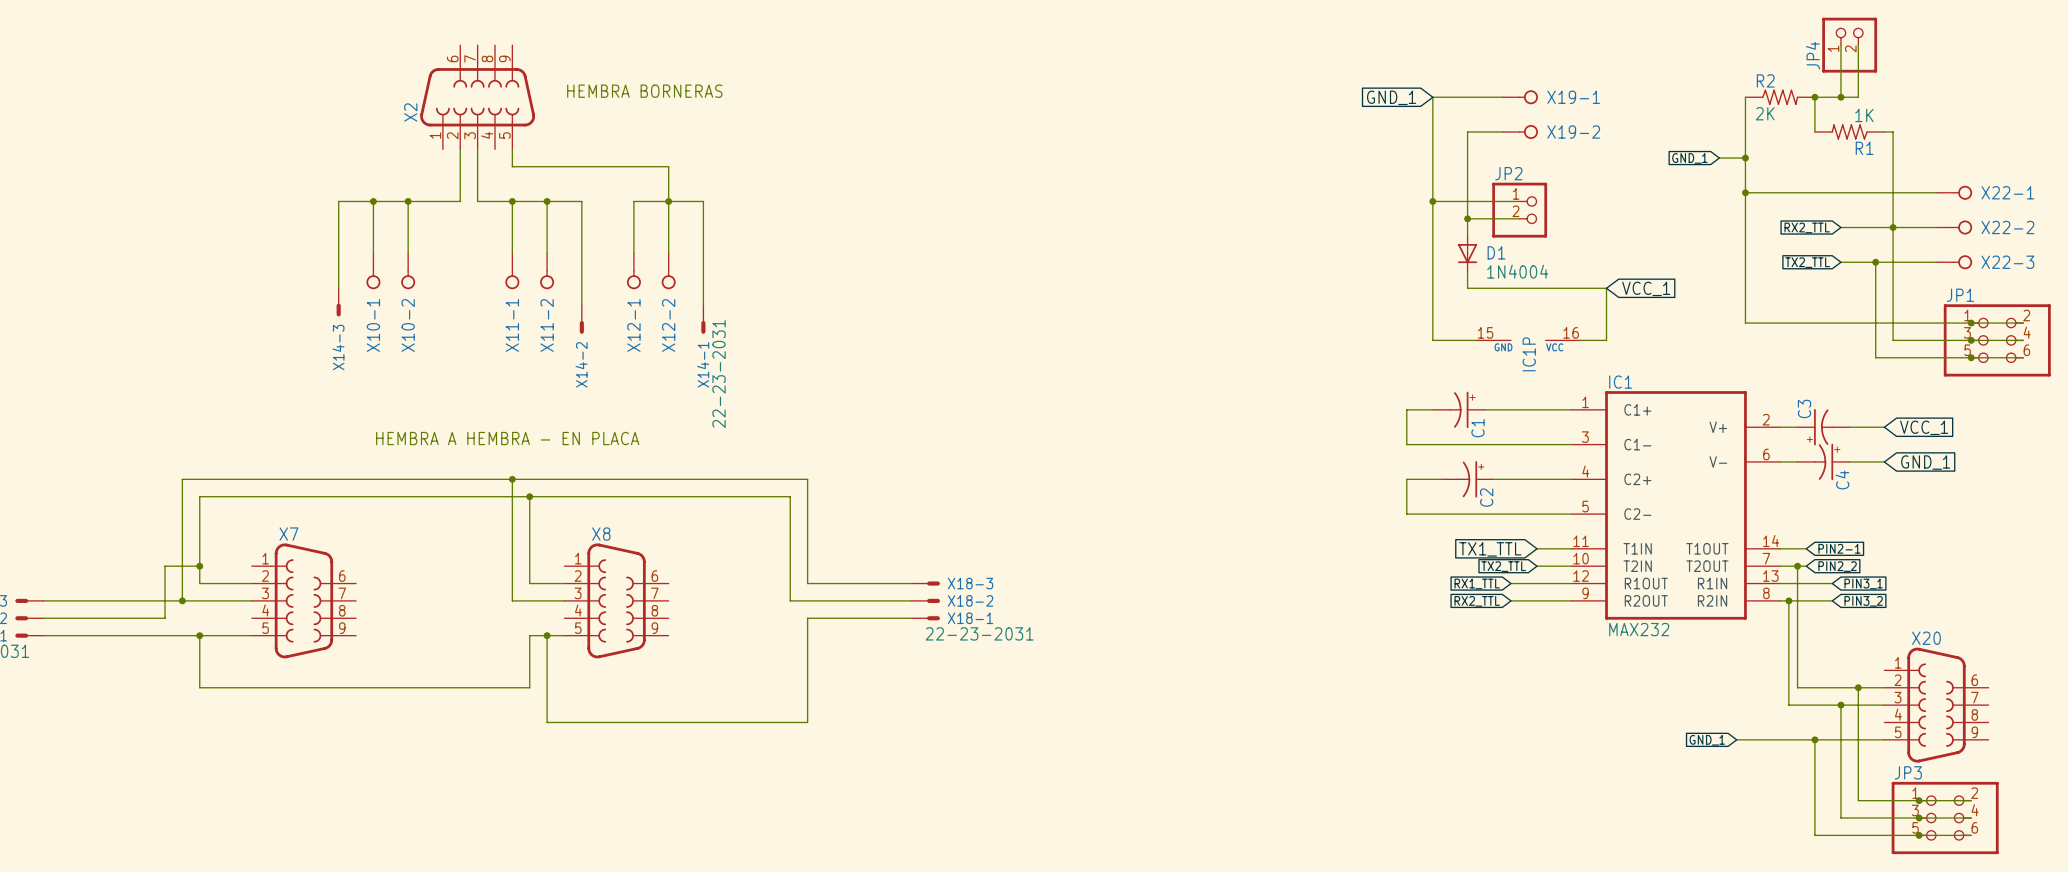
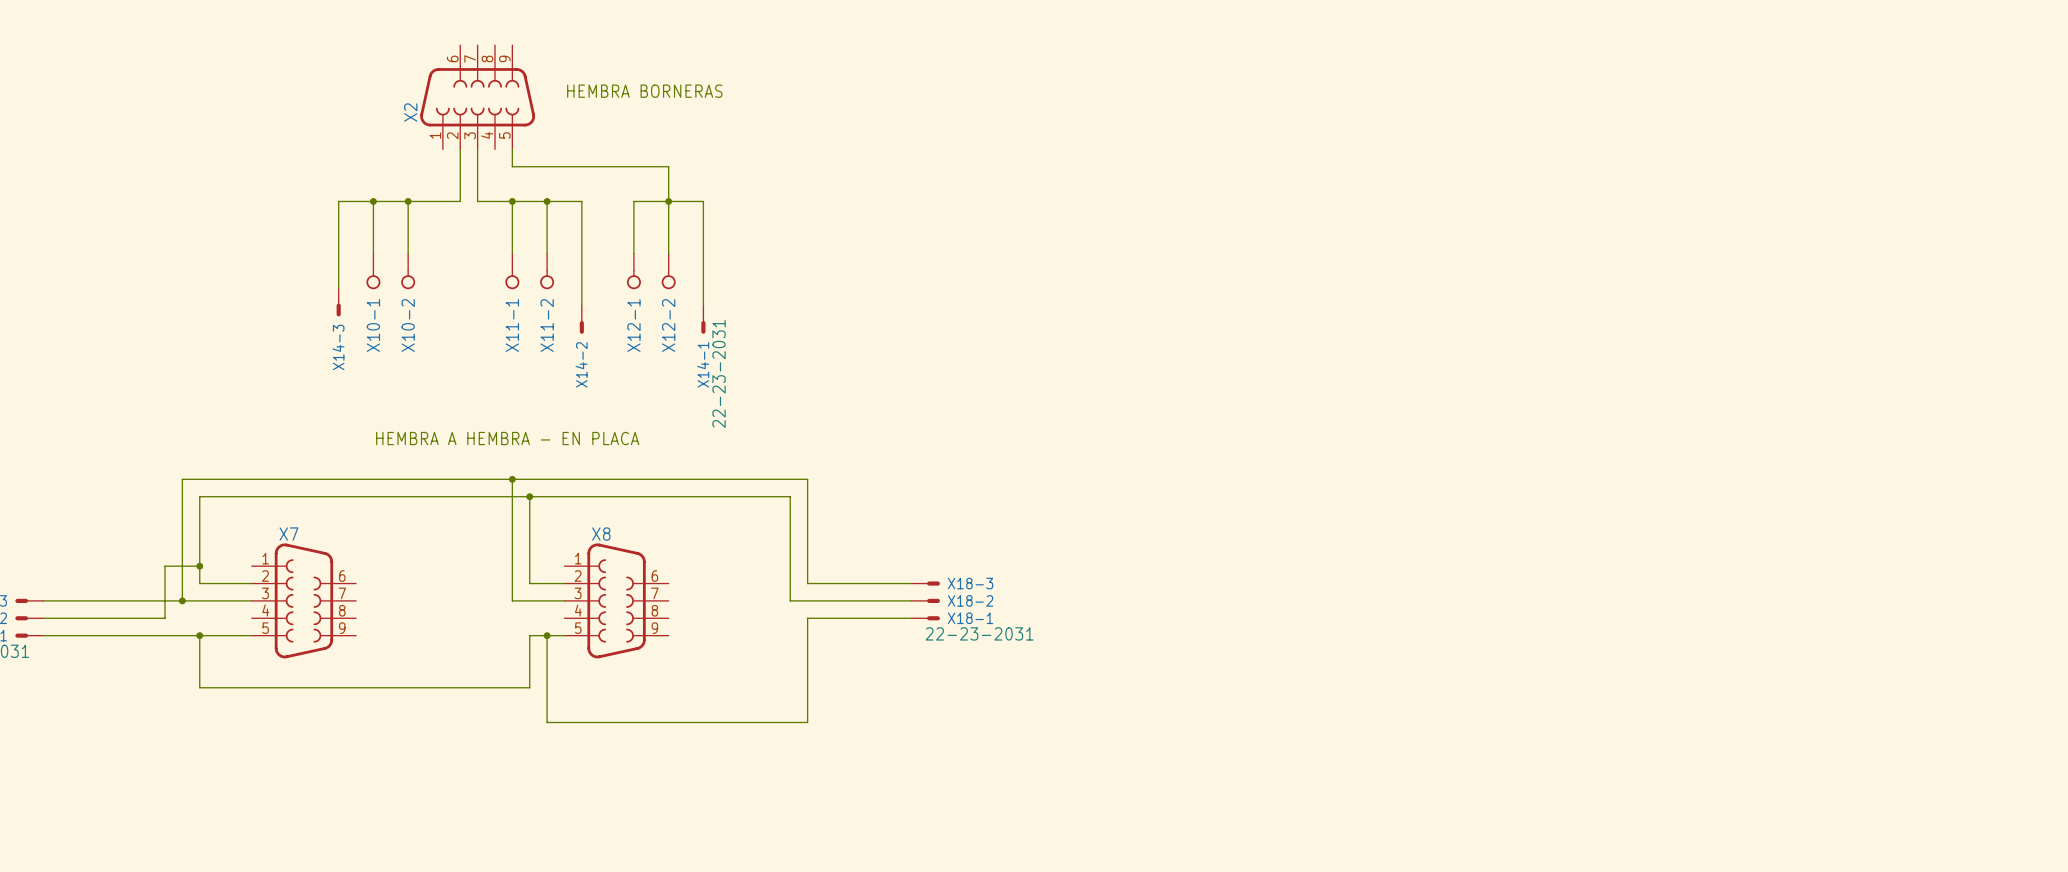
wire: (1840, 45) (1840, 97) -> none
JP4: (1849, 45) -> none
wire: (1858, 45) (1858, 97) (1814, 97) (1814, 131) -> none
global label: GND_1 (1391, 97) -> none
wire: (1502, 97) (1432, 97) (1432, 340) (1476, 340) -> none
X19-1: (1520, 97) -> none
wire: (1745, 97) (1745, 323) (2023, 323) -> none
R2: 2K (1780, 97) -> none
junction: (1814, 97) -> none
junction: (1840, 97) -> none
wire: (1502, 131) (1467, 131) (1467, 236) -> none
X19-2: (1520, 131) -> none
R1: 1K (1849, 131) -> none
wire: (1884, 131) (1893, 131) (1893, 340) (2023, 340) -> none
global label: GND_1 (1689, 158) -> none
wire: (1719, 158) (1745, 158) -> none
junction: (1745, 158) -> none
wire: (1745, 192) (1936, 192) -> none
junction: (1745, 192) -> none
X22-1: (1954, 192) -> none
wire: (1432, 201) (1519, 201) -> none
junction: (1432, 201) -> none
JP2: (1519, 210) -> none
wire: (1467, 218) (1519, 218) -> none
junction: (1467, 218) -> none
global label: RX2_TTL (1807, 227) -> none
wire: (1840, 227) (1936, 227) -> none
junction: (1893, 227) -> none
X22-2: (1954, 227) -> none
D1: 1N4004 (1467, 253) -> none
global label: TX2_TTL (1807, 262) -> none
wire: (1840, 262) (1936, 262) -> none
wire: (1875, 262) (1875, 357) (2023, 357) -> none
junction: (1875, 262) -> none
X22-3: (1954, 262) -> none
wire: (1467, 270) (1467, 288) (1606, 288) (1606, 340) (1580, 340) -> none
global label: VCC_1 (1646, 288) -> none
junction: (1971, 323) -> none
IC1P: (1528, 340) -> none
junction: (1971, 340) -> none
JP1: (1997, 340) -> none
junction: (1971, 357) -> none
wire: (1432, 409) (1406, 409) (1406, 444) (1571, 444) -> none
C1: (1458, 409) -> none
wire: (1484, 409) (1571, 409) -> none
wire: (1780, 427) (1797, 427) -> none
C3: (1823, 427) -> none
wire: (1849, 427) (1884, 427) -> none
global label: VCC_1 (1924, 427) -> none
wire: (1780, 461) (1797, 461) -> none
C4: (1823, 461) -> none
wire: (1849, 461) (1884, 461) -> none
global label: GND_1 (1925, 462) -> none
wire: (1441, 479) (1406, 479) (1406, 514) (1571, 514) -> none
C2: (1467, 479) -> none
wire: (1493, 479) (1571, 479) -> none
IC1: MAX232 (1675, 505) -> none
wire: (1537, 548) (1571, 548) -> none
wire: (1780, 548) (1806, 548) -> none
global label: PIN2-1 (1839, 548) -> none
global label: TX1_TTL (1490, 549) -> none
global label: TX2_TTL (1503, 566) -> none
wire: (1537, 566) (1571, 566) -> none
wire: (1780, 566) (1806, 566) -> none
wire: (1797, 566) (1797, 687) (1884, 687) -> none
junction: (1797, 566) -> none
global label: PIN2_2 (1837, 566) -> none
global label: RX1_TTL (1477, 583) -> none
wire: (1510, 583) (1571, 583) -> none
wire: (1780, 583) (1832, 583) -> none
global label: PIN3_1 (1863, 583) -> none
wire: (1510, 600) (1571, 600) -> none
wire: (1780, 600) (1832, 600) -> none
wire: (1788, 600) (1788, 705) (1884, 705) -> none
junction: (1788, 600) -> none
global label: RX2_TTL (1477, 601) -> none
global label: PIN3_2 (1863, 601) -> none
wire: (1858, 687) (1858, 800) (1971, 800) -> none
junction: (1858, 687) -> none
wire: (1840, 705) (1840, 818) (1971, 818) -> none
junction: (1840, 705) -> none
X20: (1936, 705) -> none
wire: (1736, 739) (1884, 739) -> none
wire: (1814, 739) (1814, 835) (1971, 835) -> none
junction: (1814, 739) -> none
global label: GND_1 (1707, 740) -> none
junction: (1919, 800) -> none
junction: (1919, 818) -> none
JP3: (1945, 818) -> none
junction: (1919, 835) -> none

